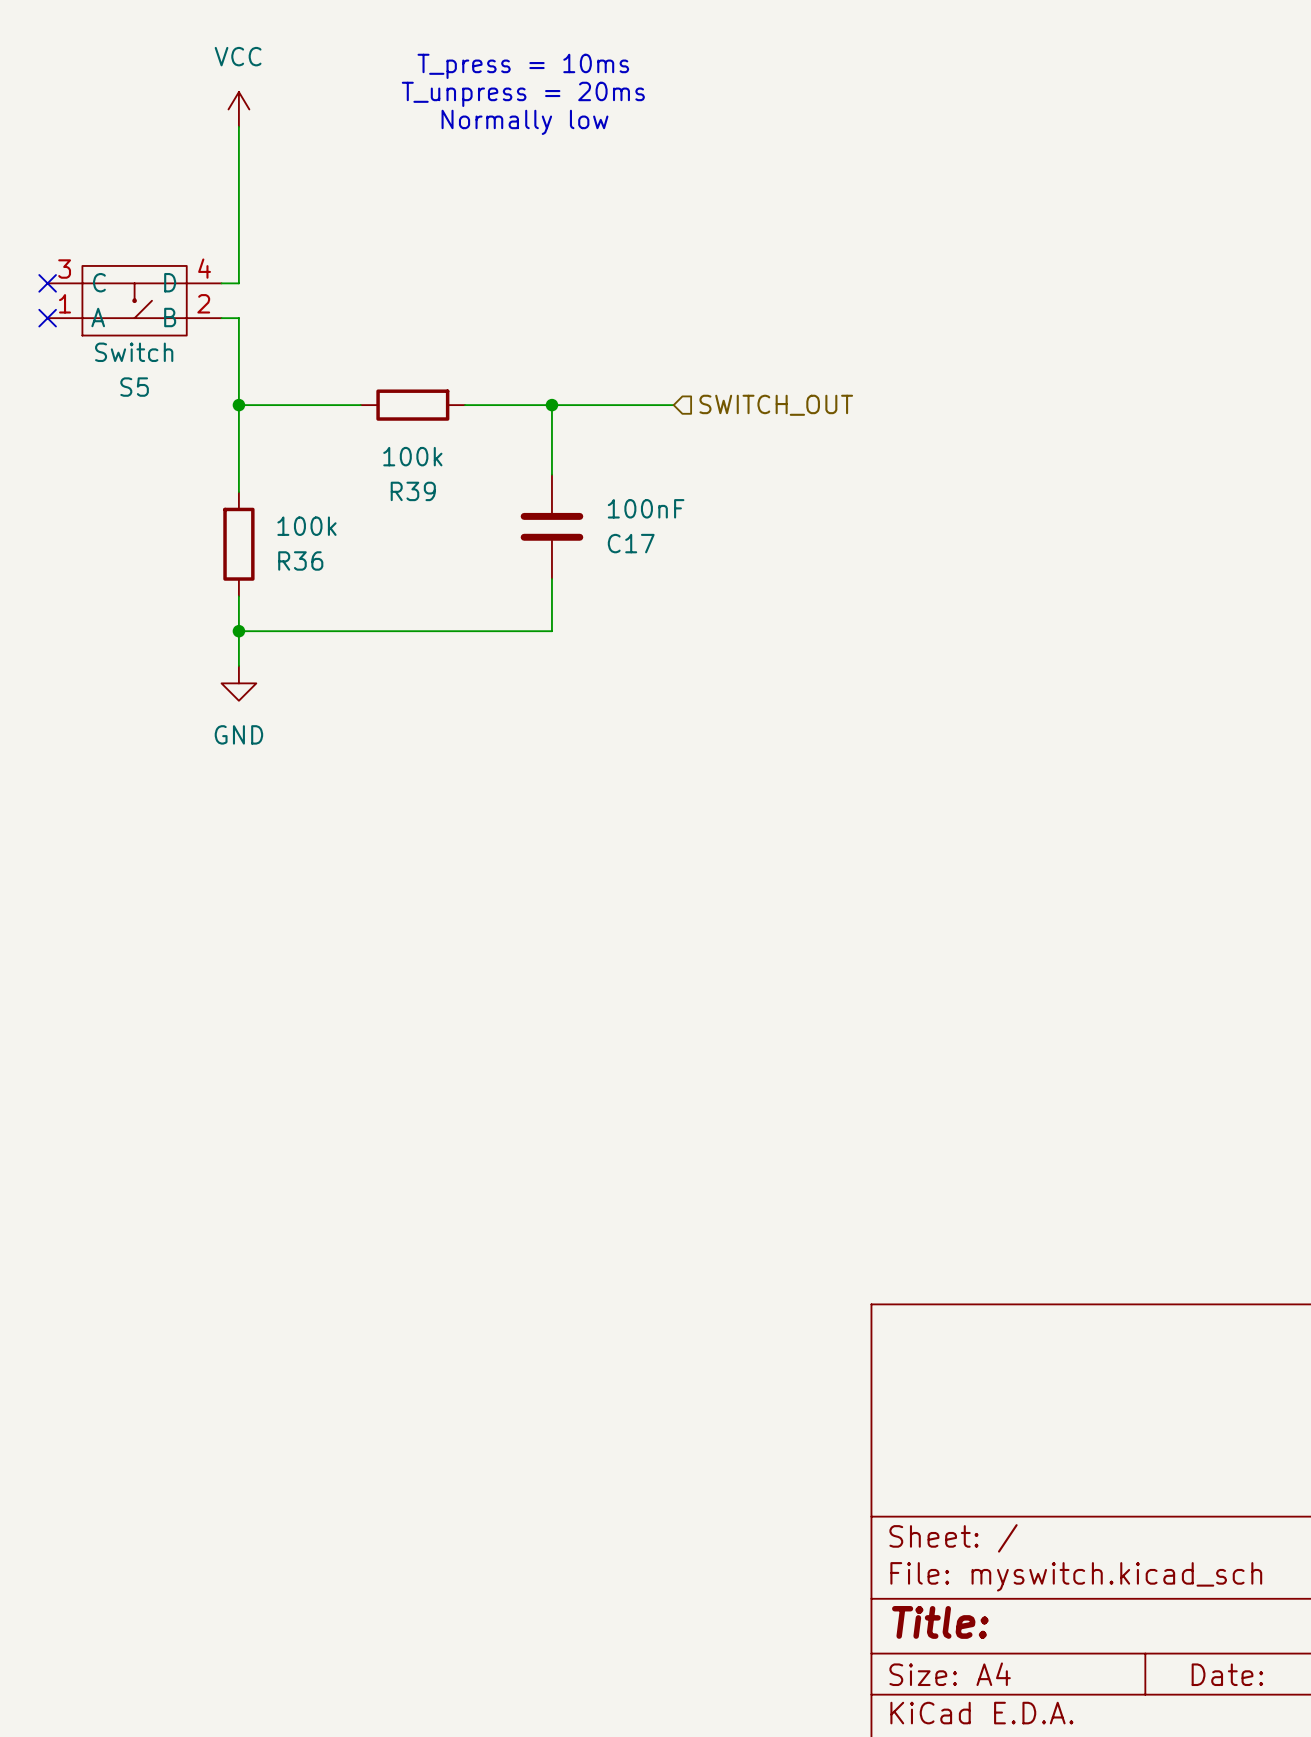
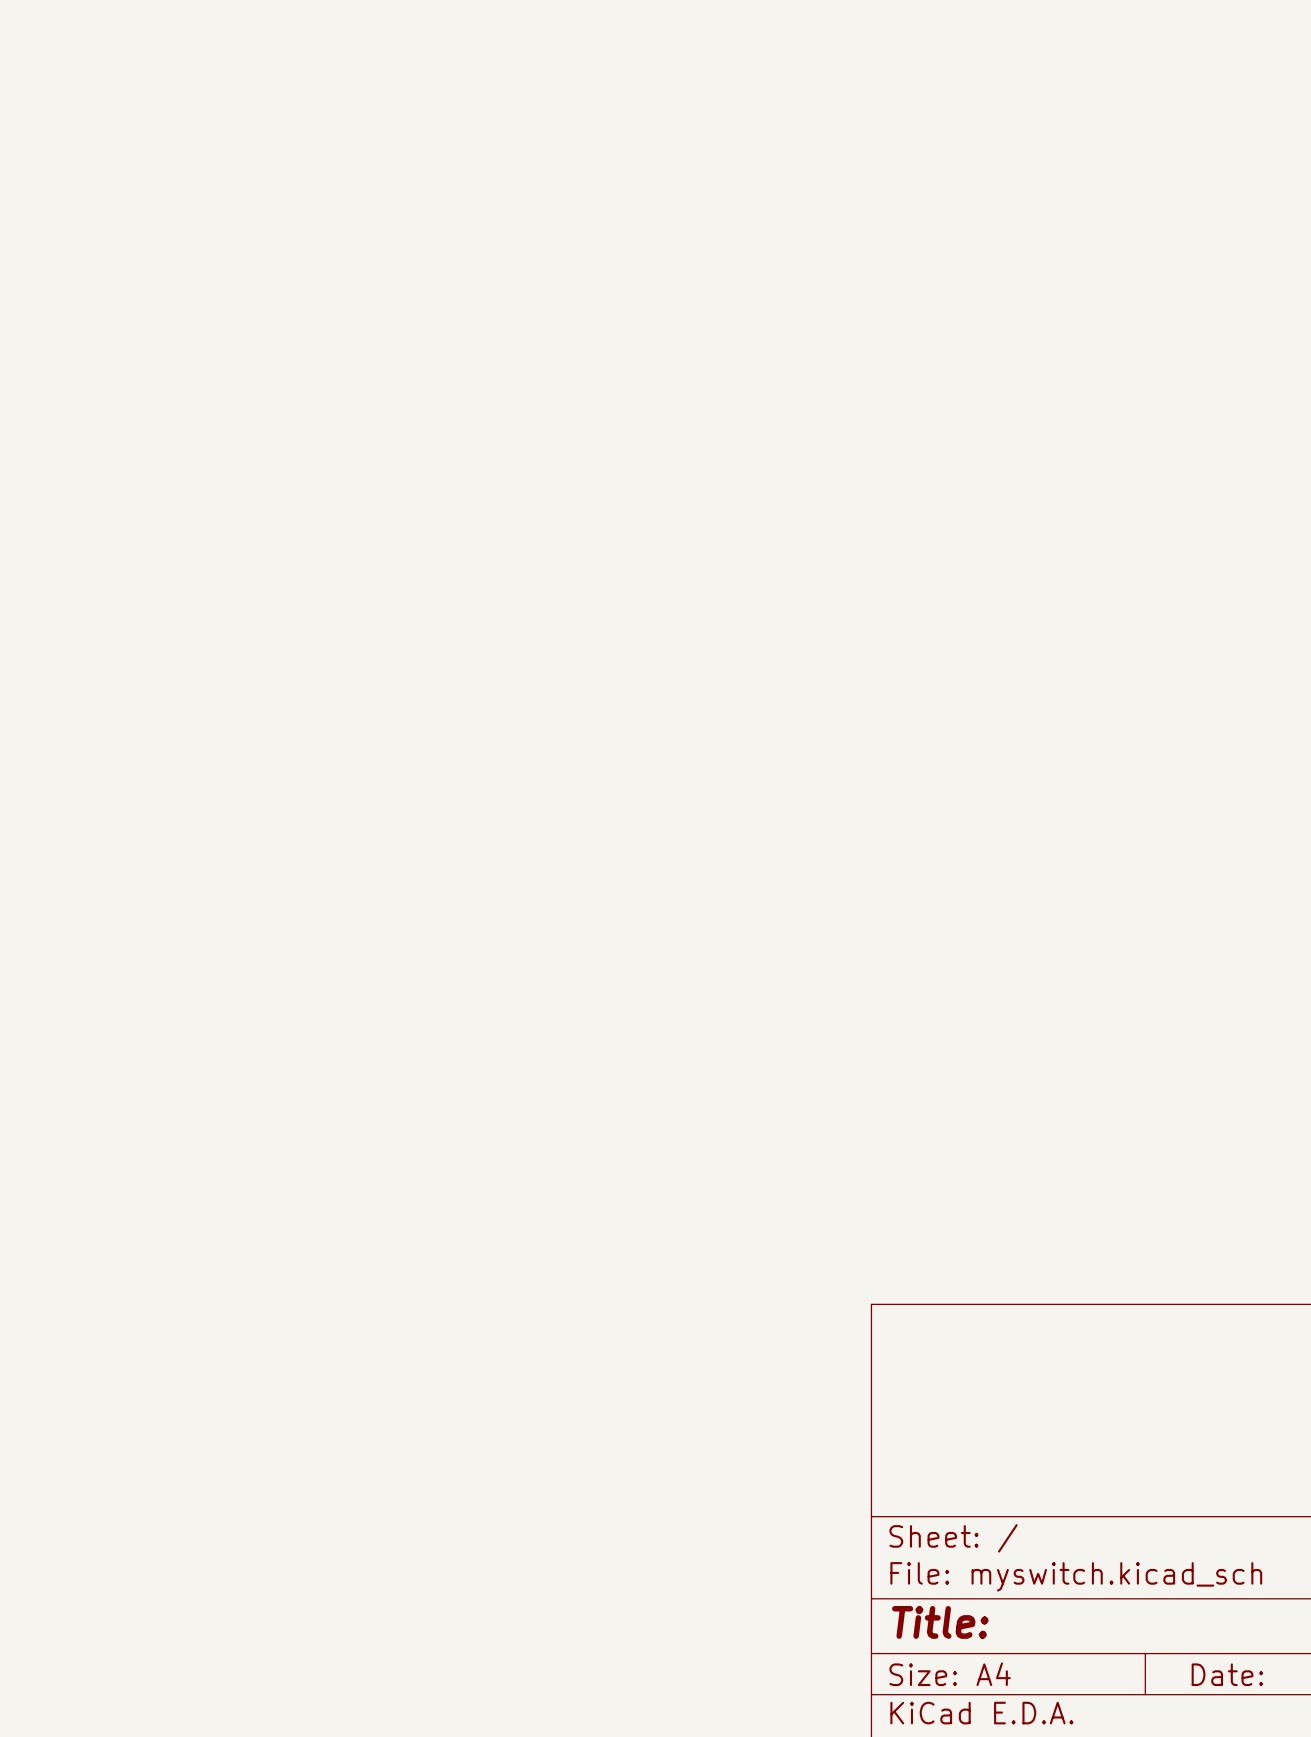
text: T_press = 10ms (523, 66) -> none
text: T_unpress = 20ms (523, 94) -> none
power symbol: VCC (238, 109) -> none
text: Normally low (524, 122) -> none
wire: (238, 126) (238, 283) (221, 283) -> none
no-connect mark: (47, 283) -> none
S5: Switch (134, 300) -> none
no-connect mark: (47, 318) -> none
wire: (221, 318) (238, 318) (238, 492) -> none
wire: (238, 405) (360, 405) -> none
junction: (238, 405) -> none
R39: 100k (412, 405) -> none
wire: (465, 405) (673, 405) -> none
wire: (551, 405) (551, 474) -> none
junction: (551, 405) -> none
hierarchical label: SWITCH_OUT (776, 405) -> none
C17: 100nF (551, 526) -> none
R36: 100k (238, 544) -> none
wire: (551, 579) (551, 631) (238, 631) -> none
wire: (238, 596) (238, 665) -> none
junction: (238, 631) -> none
power symbol: GND (238, 683) -> none

